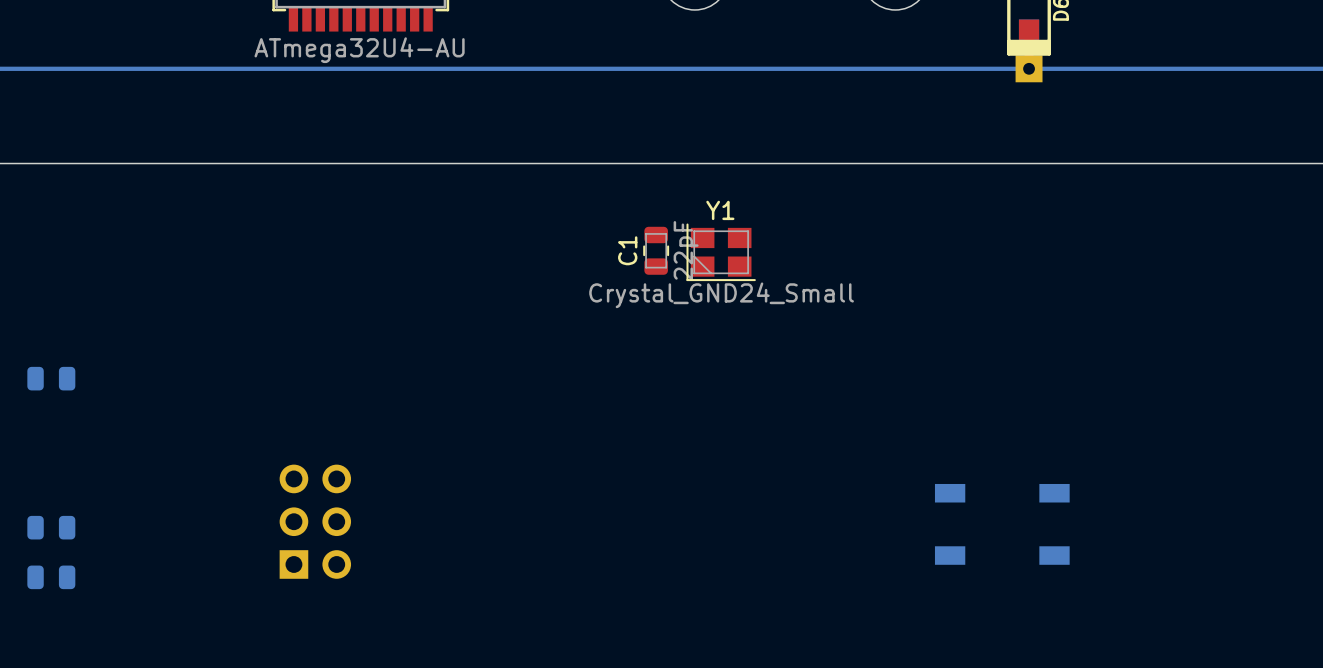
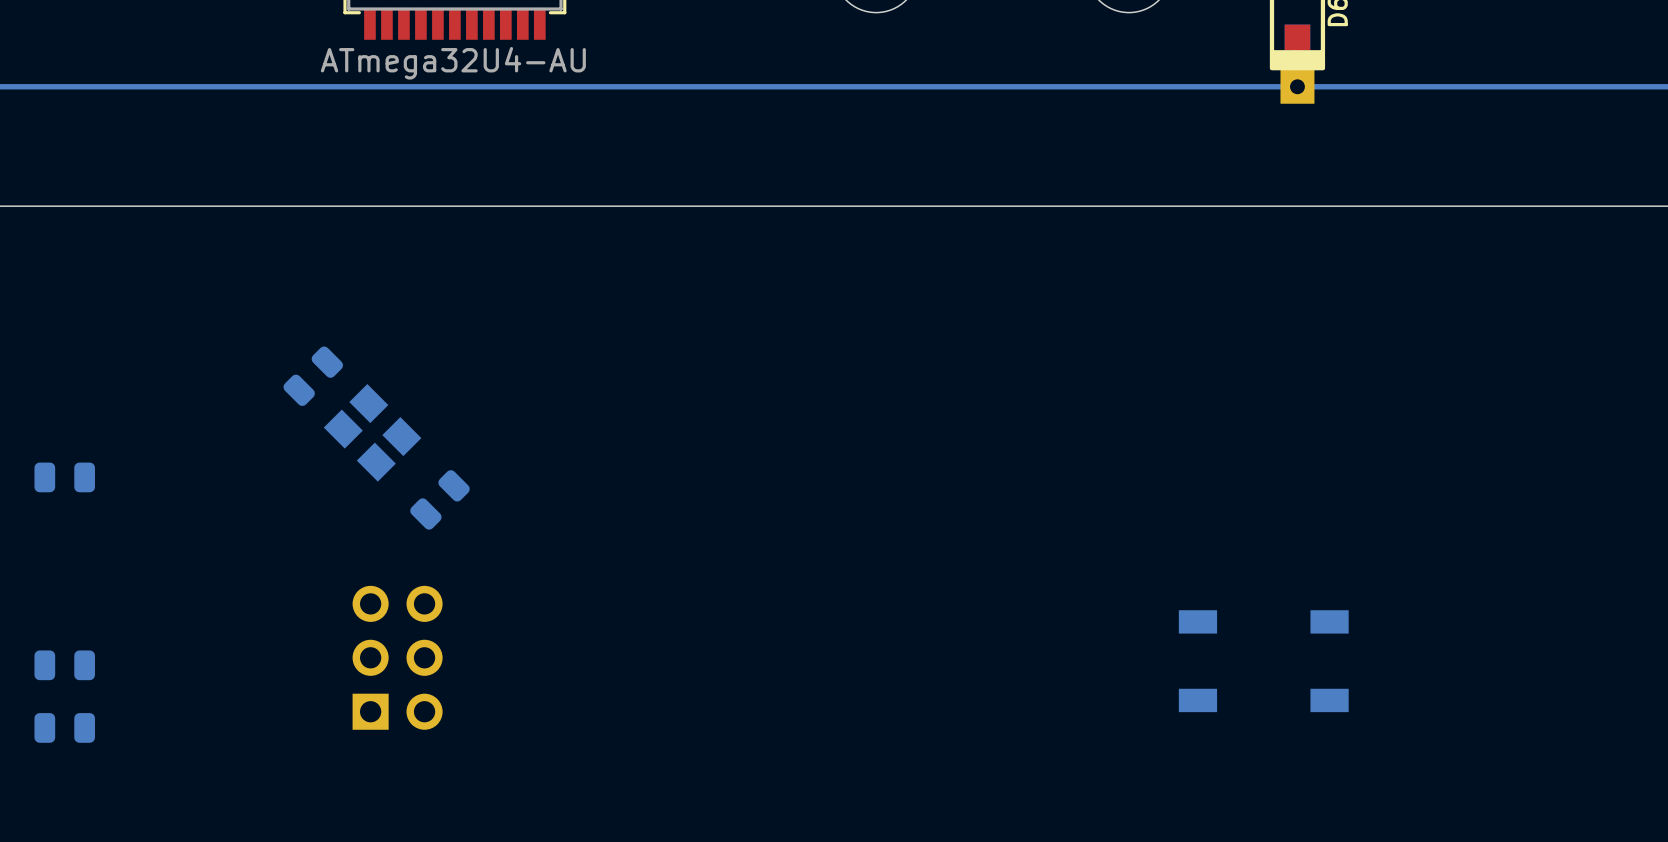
C1 side: top (656, 250) -> bottom (313, 376)
Y1: Crystal_GND24_Small (721, 252) -> none
part: none -> (372, 432)
part: none -> (439, 499)

